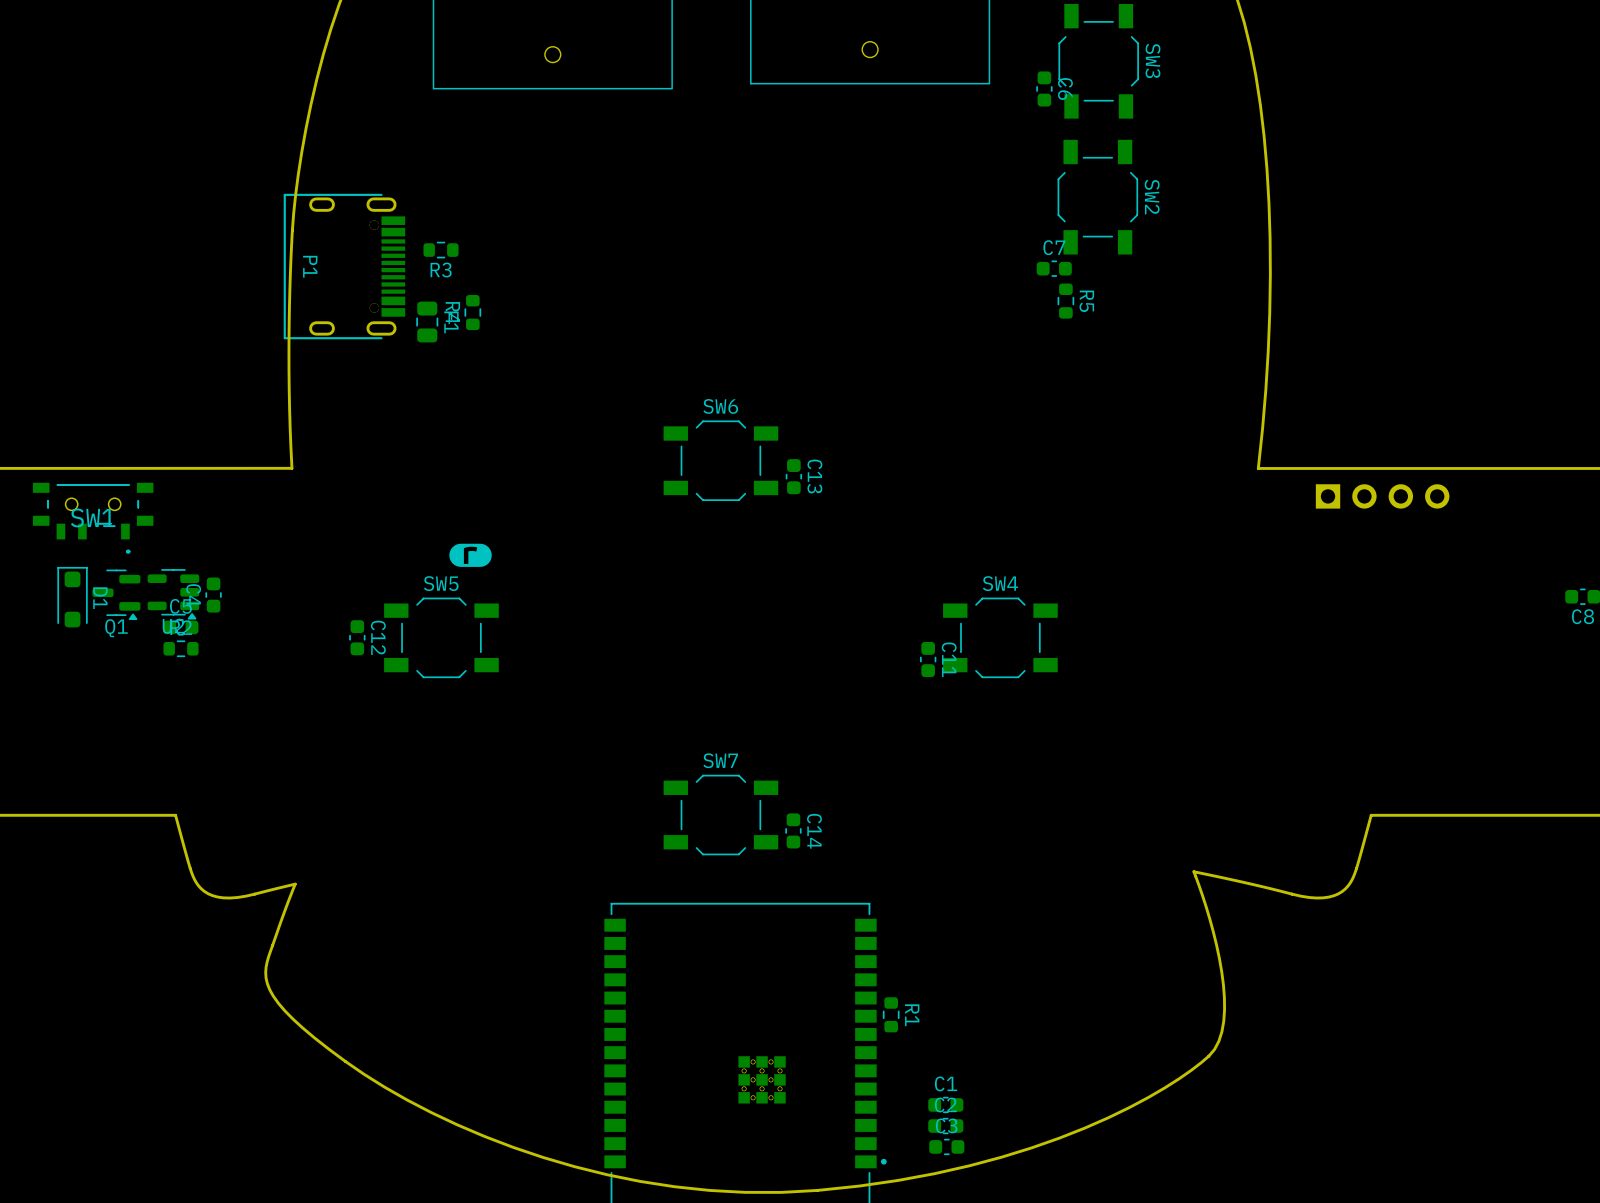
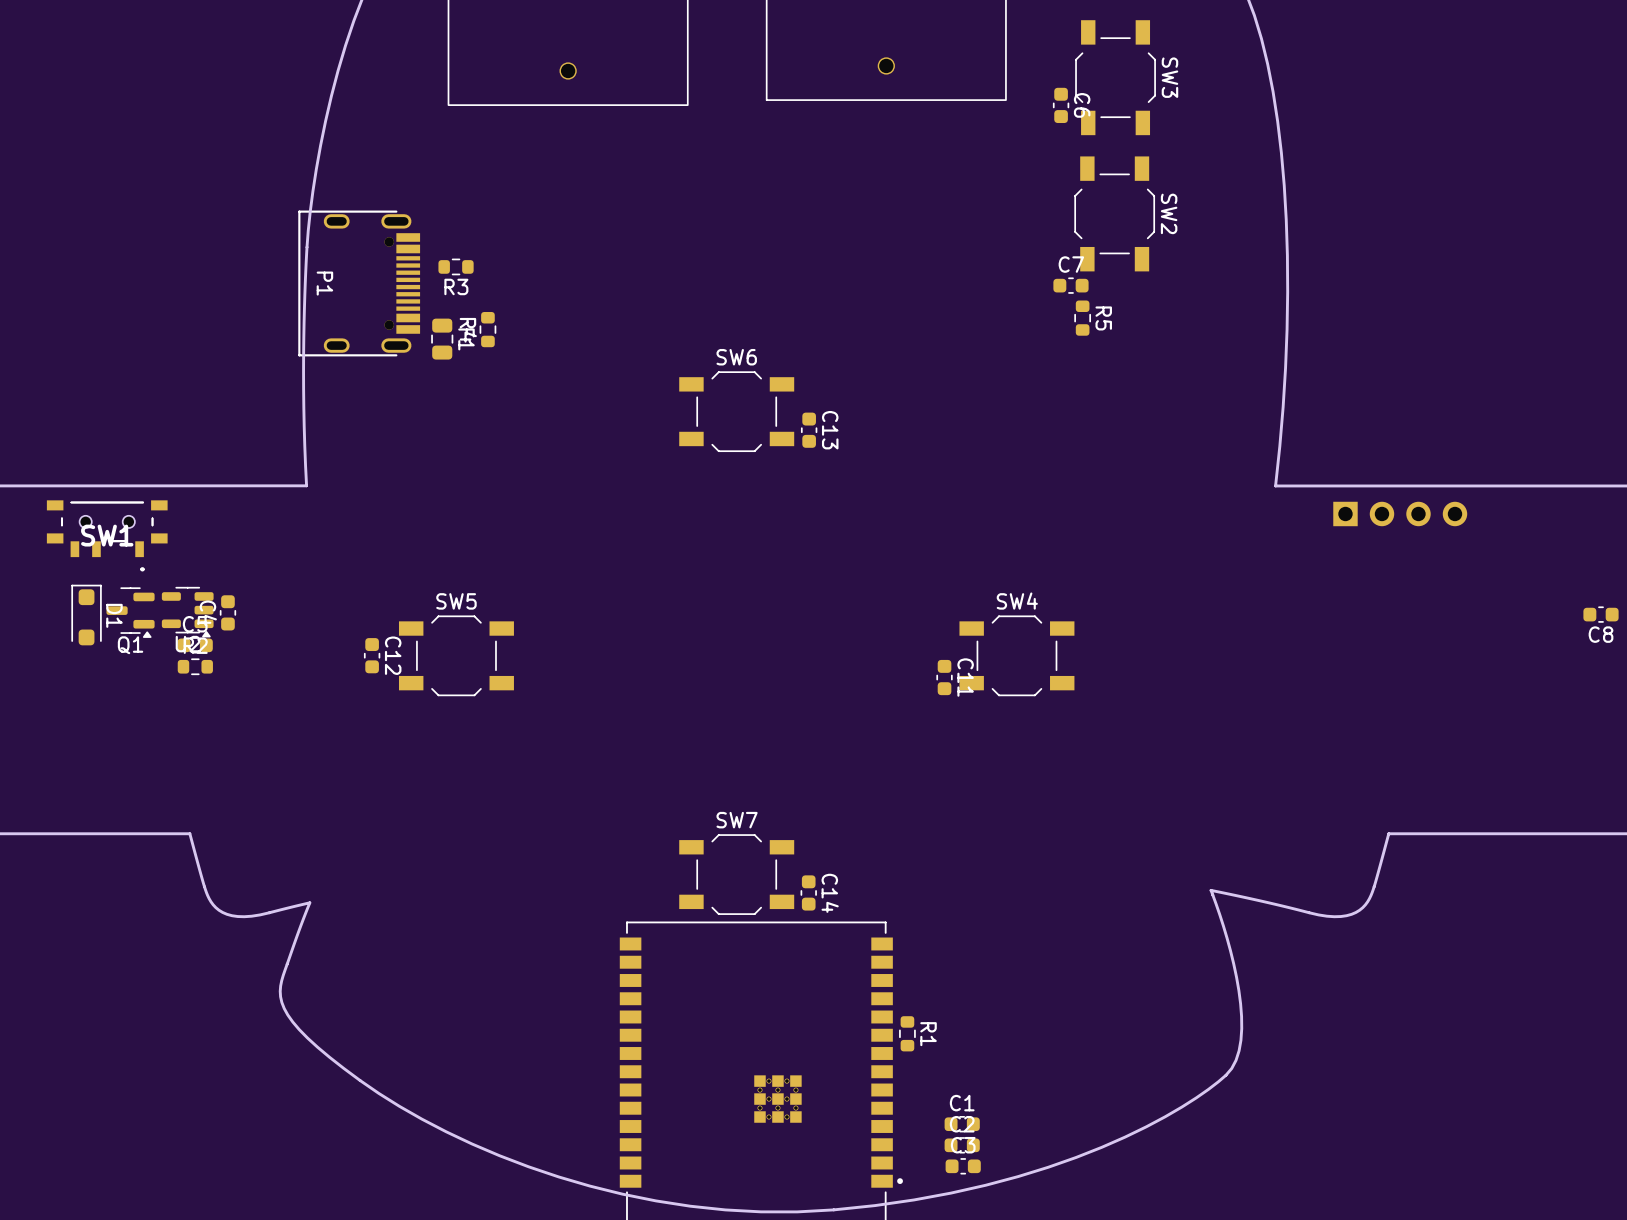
SW6 position: (720, 460) -> (736, 411)
C13 position: (793, 476) -> (809, 430)
drawing: [449, 543, 492, 567] -> none
SW7 position: (720, 815) -> (736, 874)
C14 position: (793, 830) -> (808, 892)

